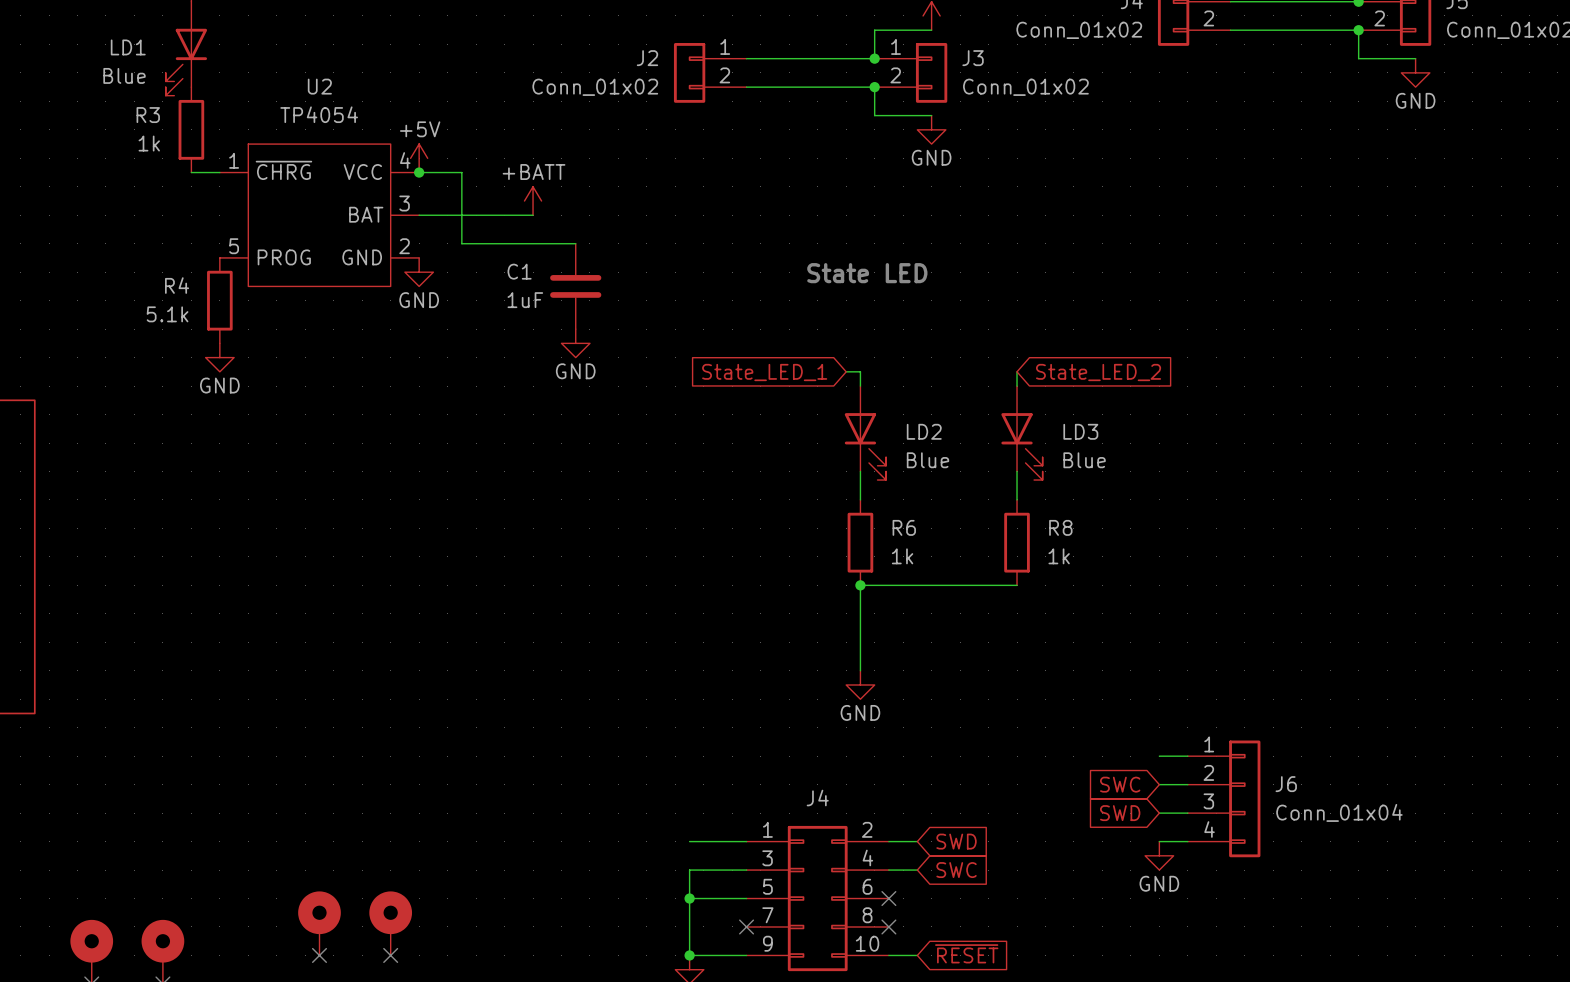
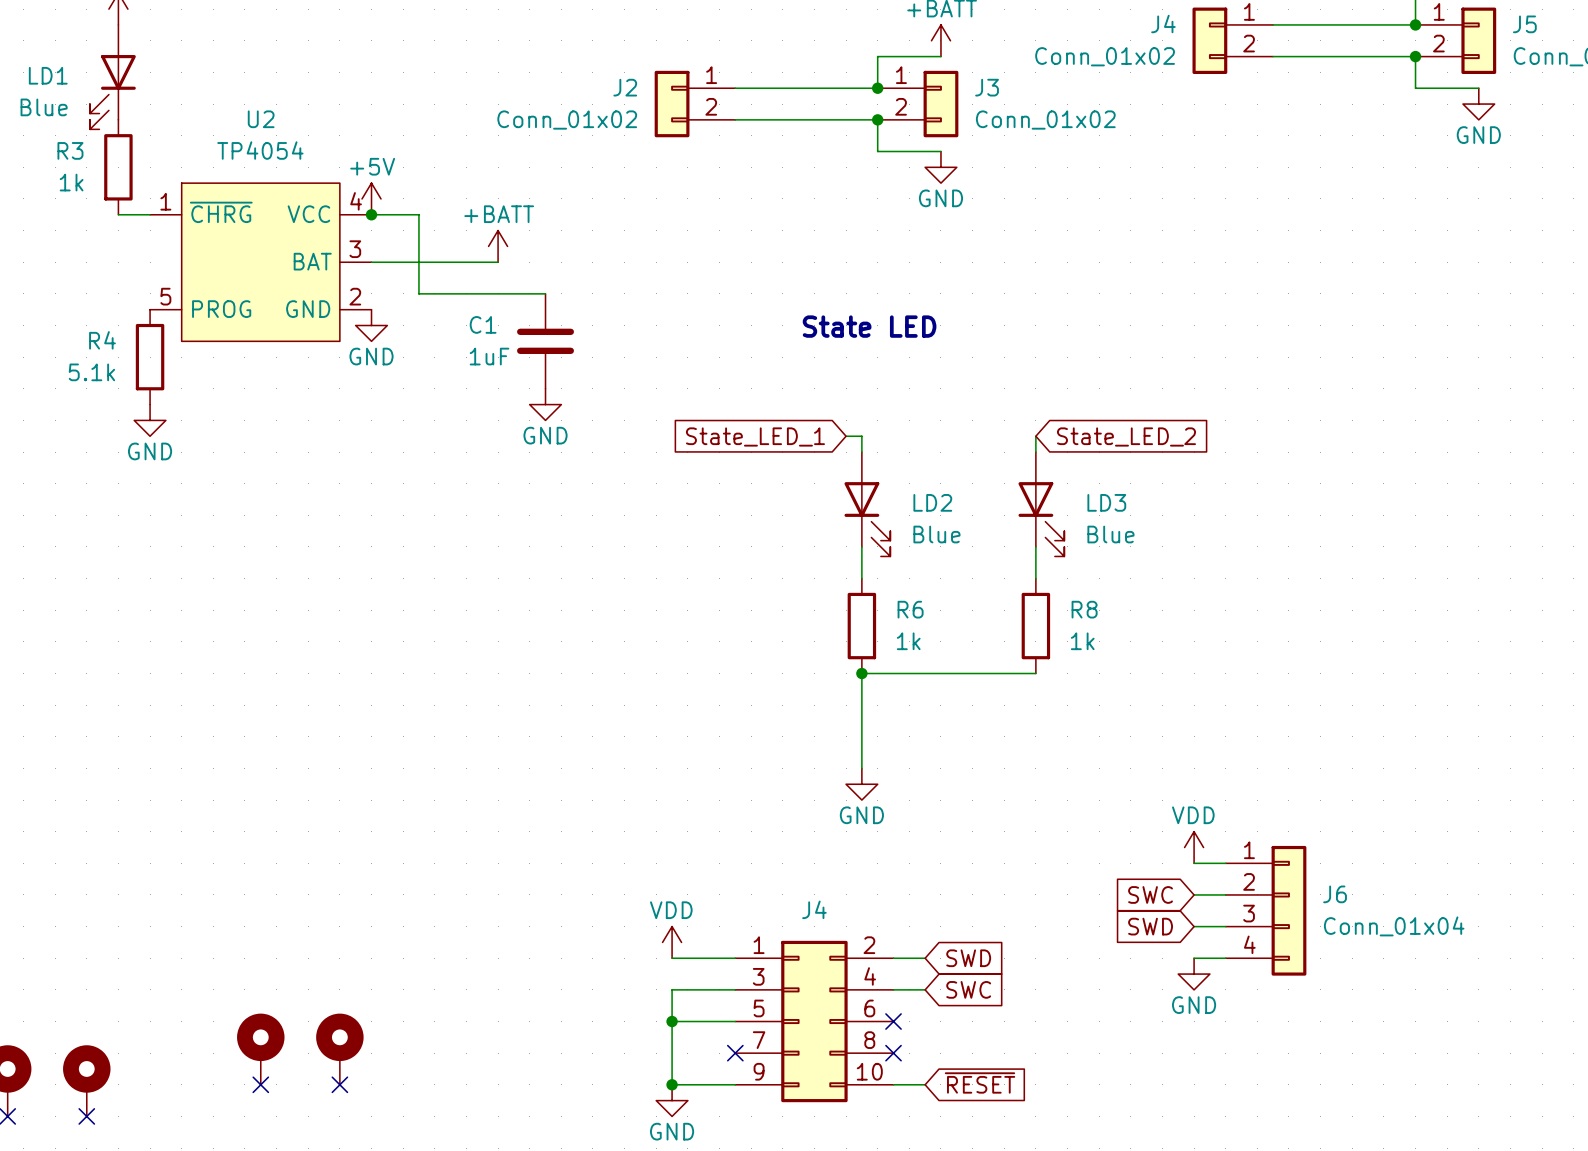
power symbol: none -> VDD (1194, 847)
power symbol: none -> VDD (672, 942)

